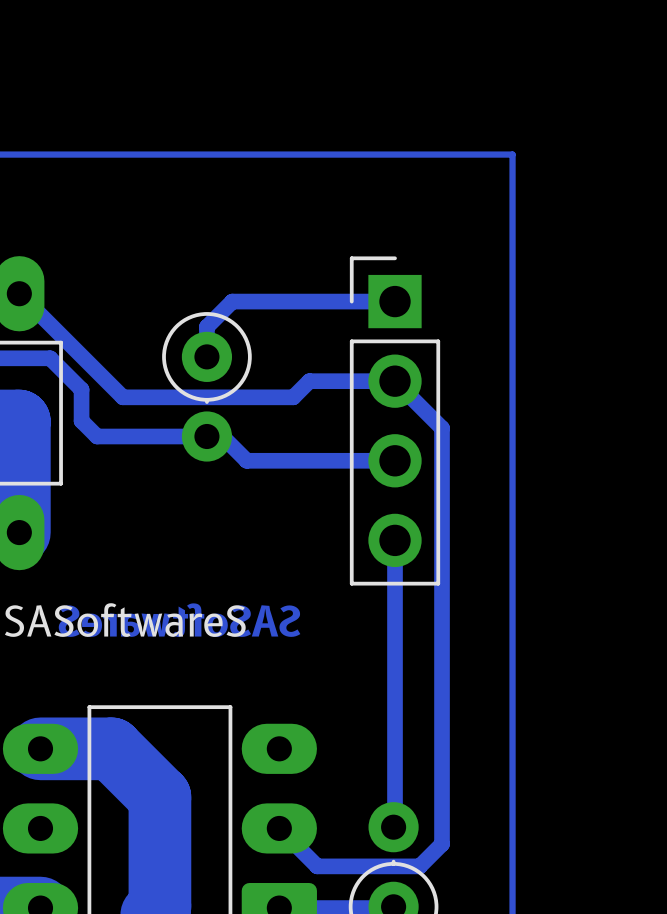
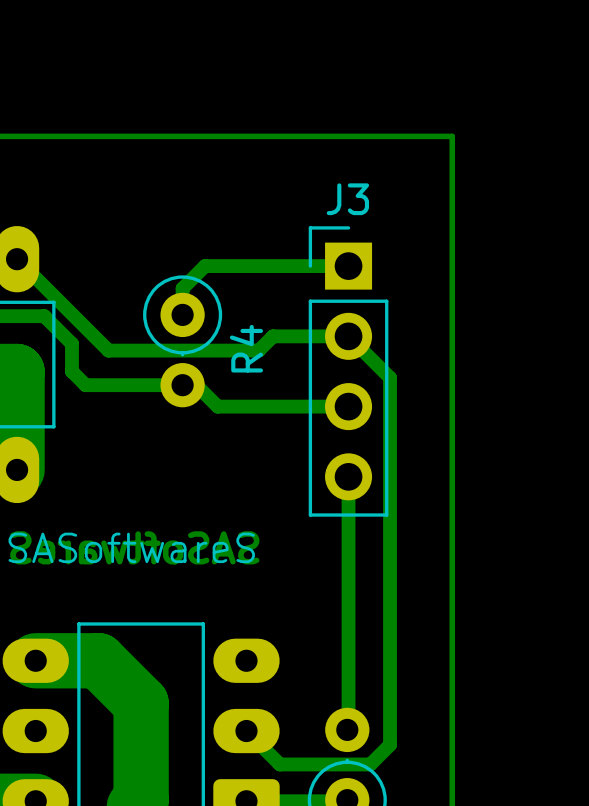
J3 name: none -> J3 (347, 199)
R4 name: none -> R4 (246, 348)

